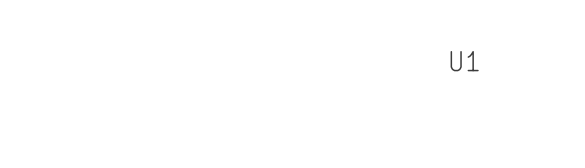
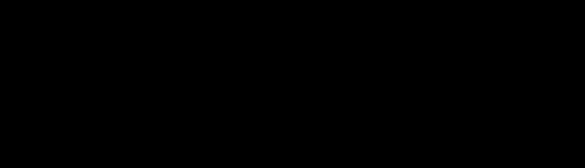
U1 name: U1 (464, 61) -> none

